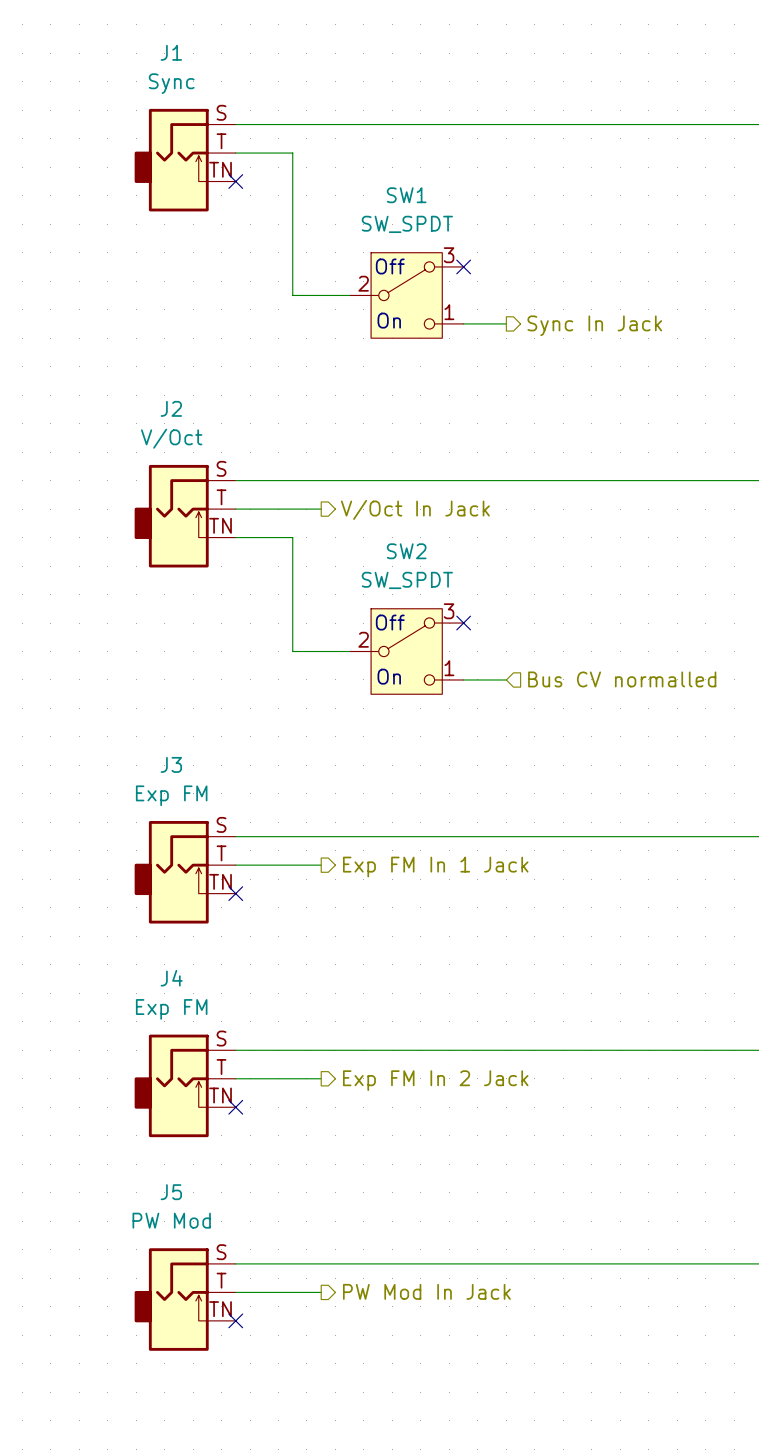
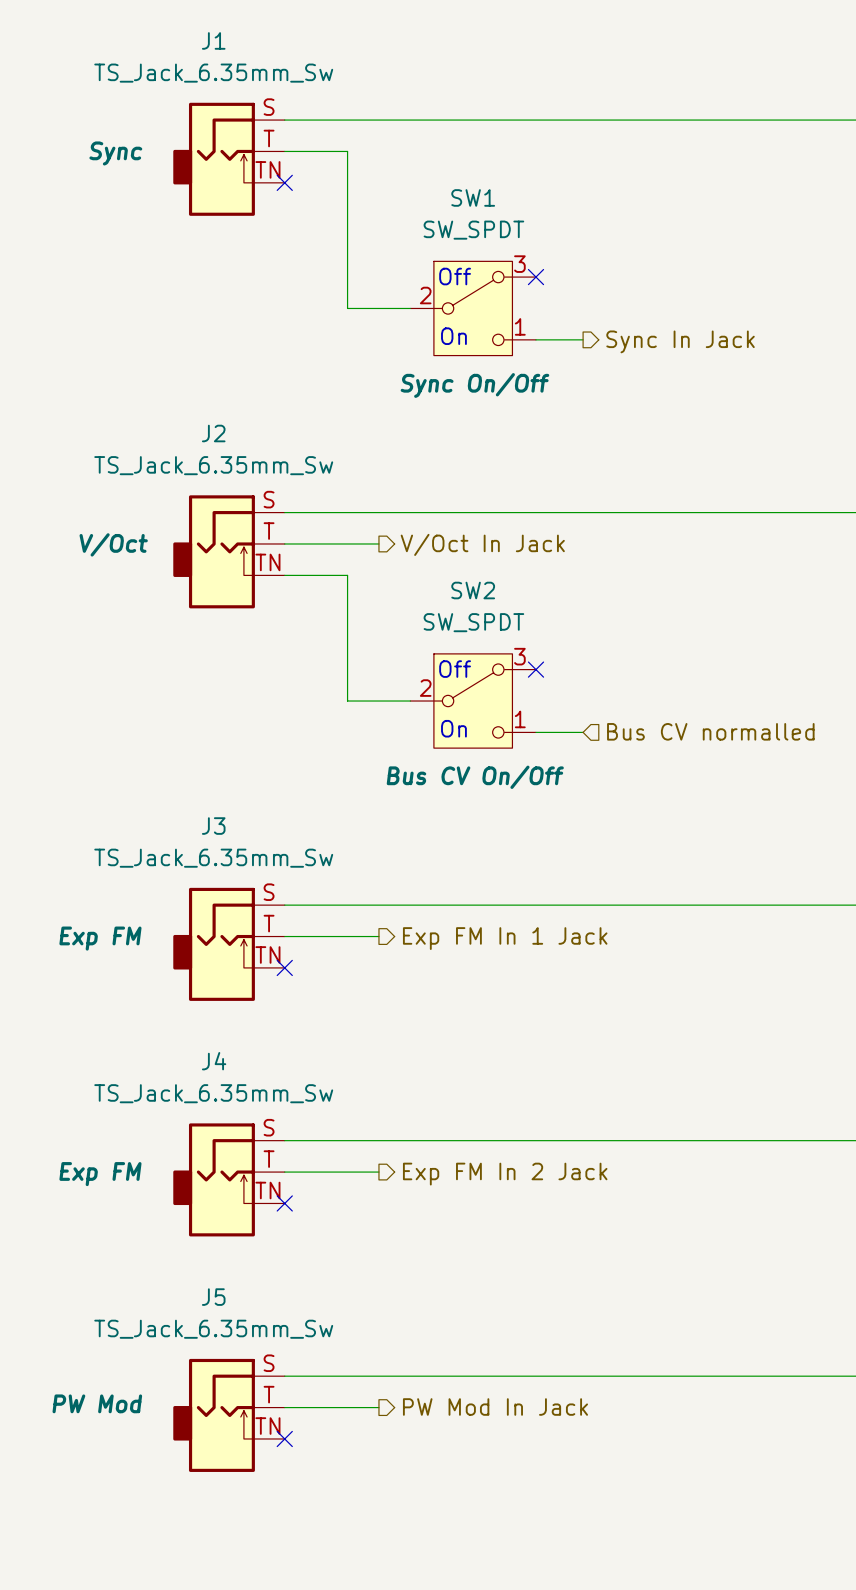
J1 value: Sync (171, 83) -> TS_Jack_6.35mm_Sw (213, 73)
J1 text: none -> Sync (115, 153)
SW1 text: none -> Sync On/Off (474, 385)
J2 value: V/Oct (171, 438) -> TS_Jack_6.35mm_Sw (213, 465)
J2 text: none -> V/Oct (113, 544)
SW2 text: none -> Bus CV On/Off (475, 777)
J3 value: Exp FM (171, 795) -> TS_Jack_6.35mm_Sw (213, 858)
J3 text: none -> Exp FM (100, 938)
J4 value: Exp FM (171, 1009) -> TS_Jack_6.35mm_Sw (213, 1093)
J4 text: none -> Exp FM (100, 1174)
J5 value: PW Mod (171, 1220) -> TS_Jack_6.35mm_Sw (213, 1329)
J5 text: none -> PW Mod (97, 1403)

